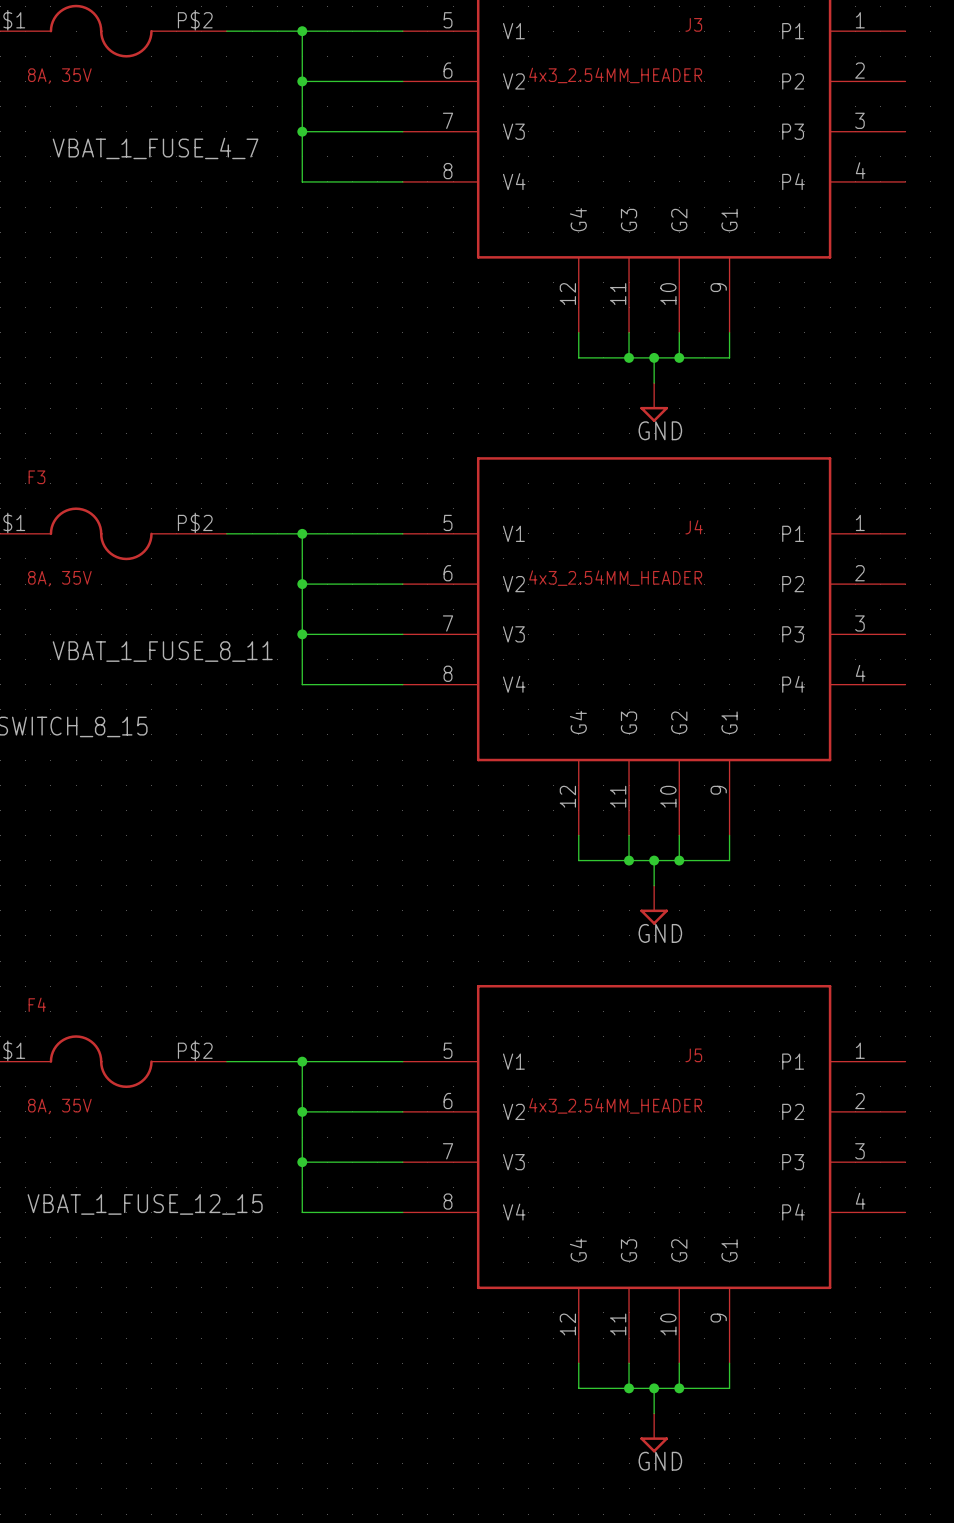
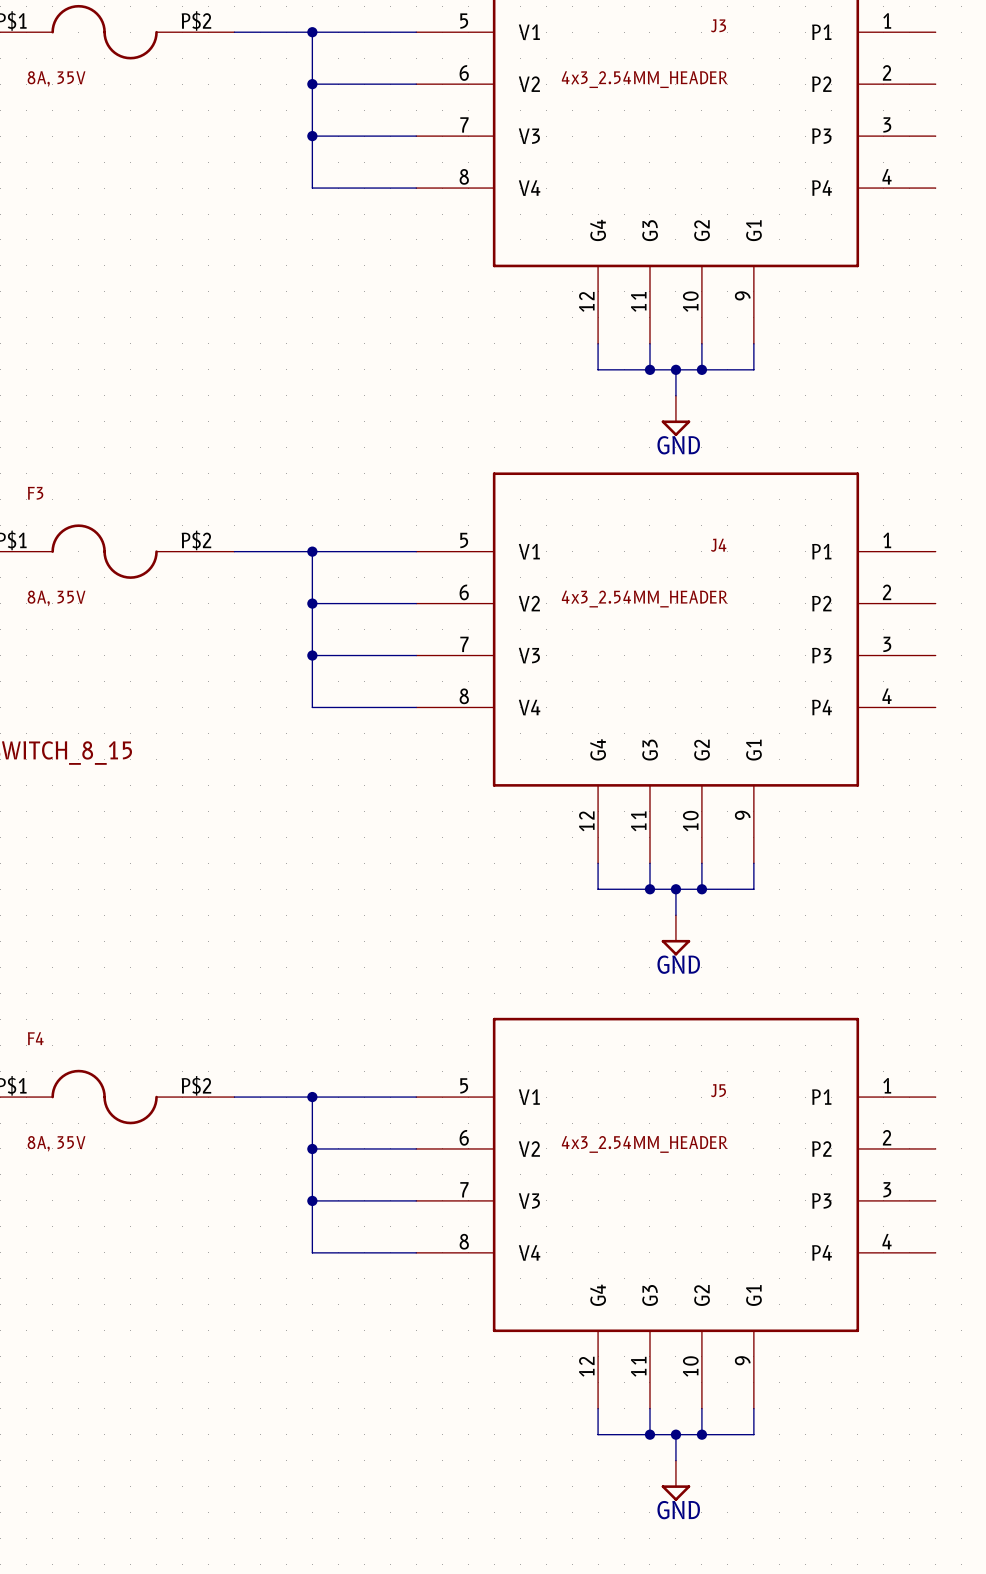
label: VBAT_1_FUSE_4_7 (155, 148) -> none
label: VBAT_1_FUSE_8_11 (162, 651) -> none
label: VBAT_1_FUSE_12_15 (145, 1204) -> none

